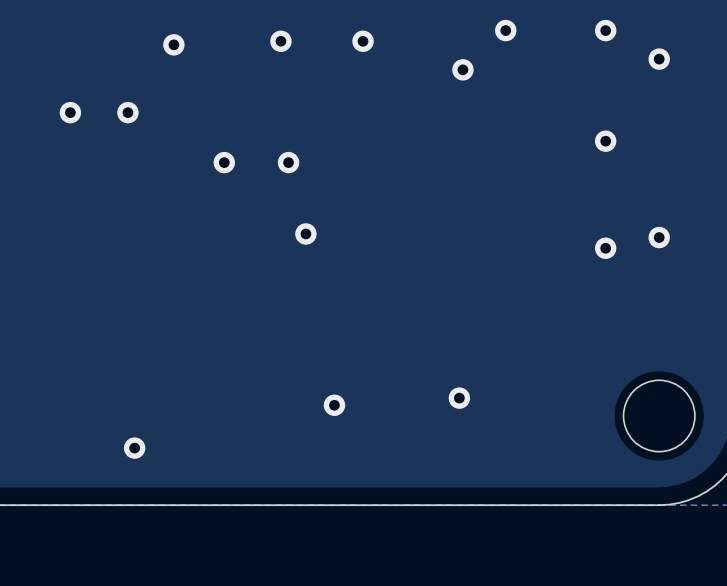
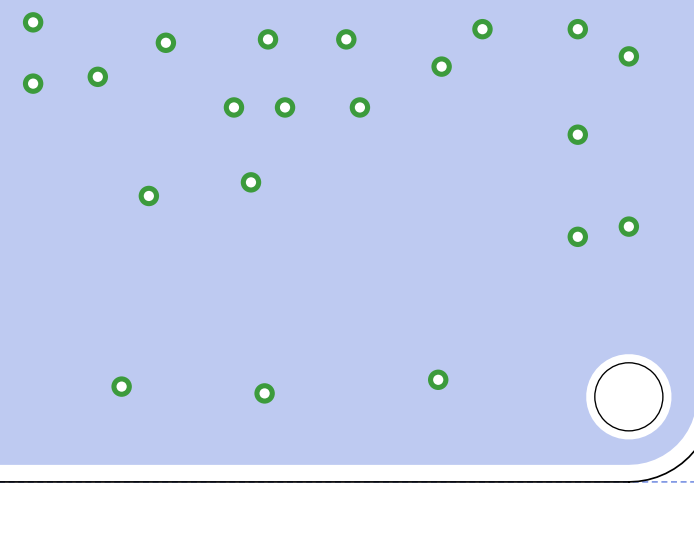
via: none -> (33, 22)
via: none -> (97, 76)
via: none -> (33, 83)
via: (70, 112) -> none
via: (127, 112) -> none
via: none -> (233, 107)
via: none -> (285, 107)
via: none -> (359, 107)
via: (224, 162) -> none
via: (288, 162) -> none
via: none -> (250, 182)
via: none -> (148, 195)
via: (305, 233) -> none
via position: (334, 405) -> (264, 393)
via position: (134, 448) -> (121, 386)

